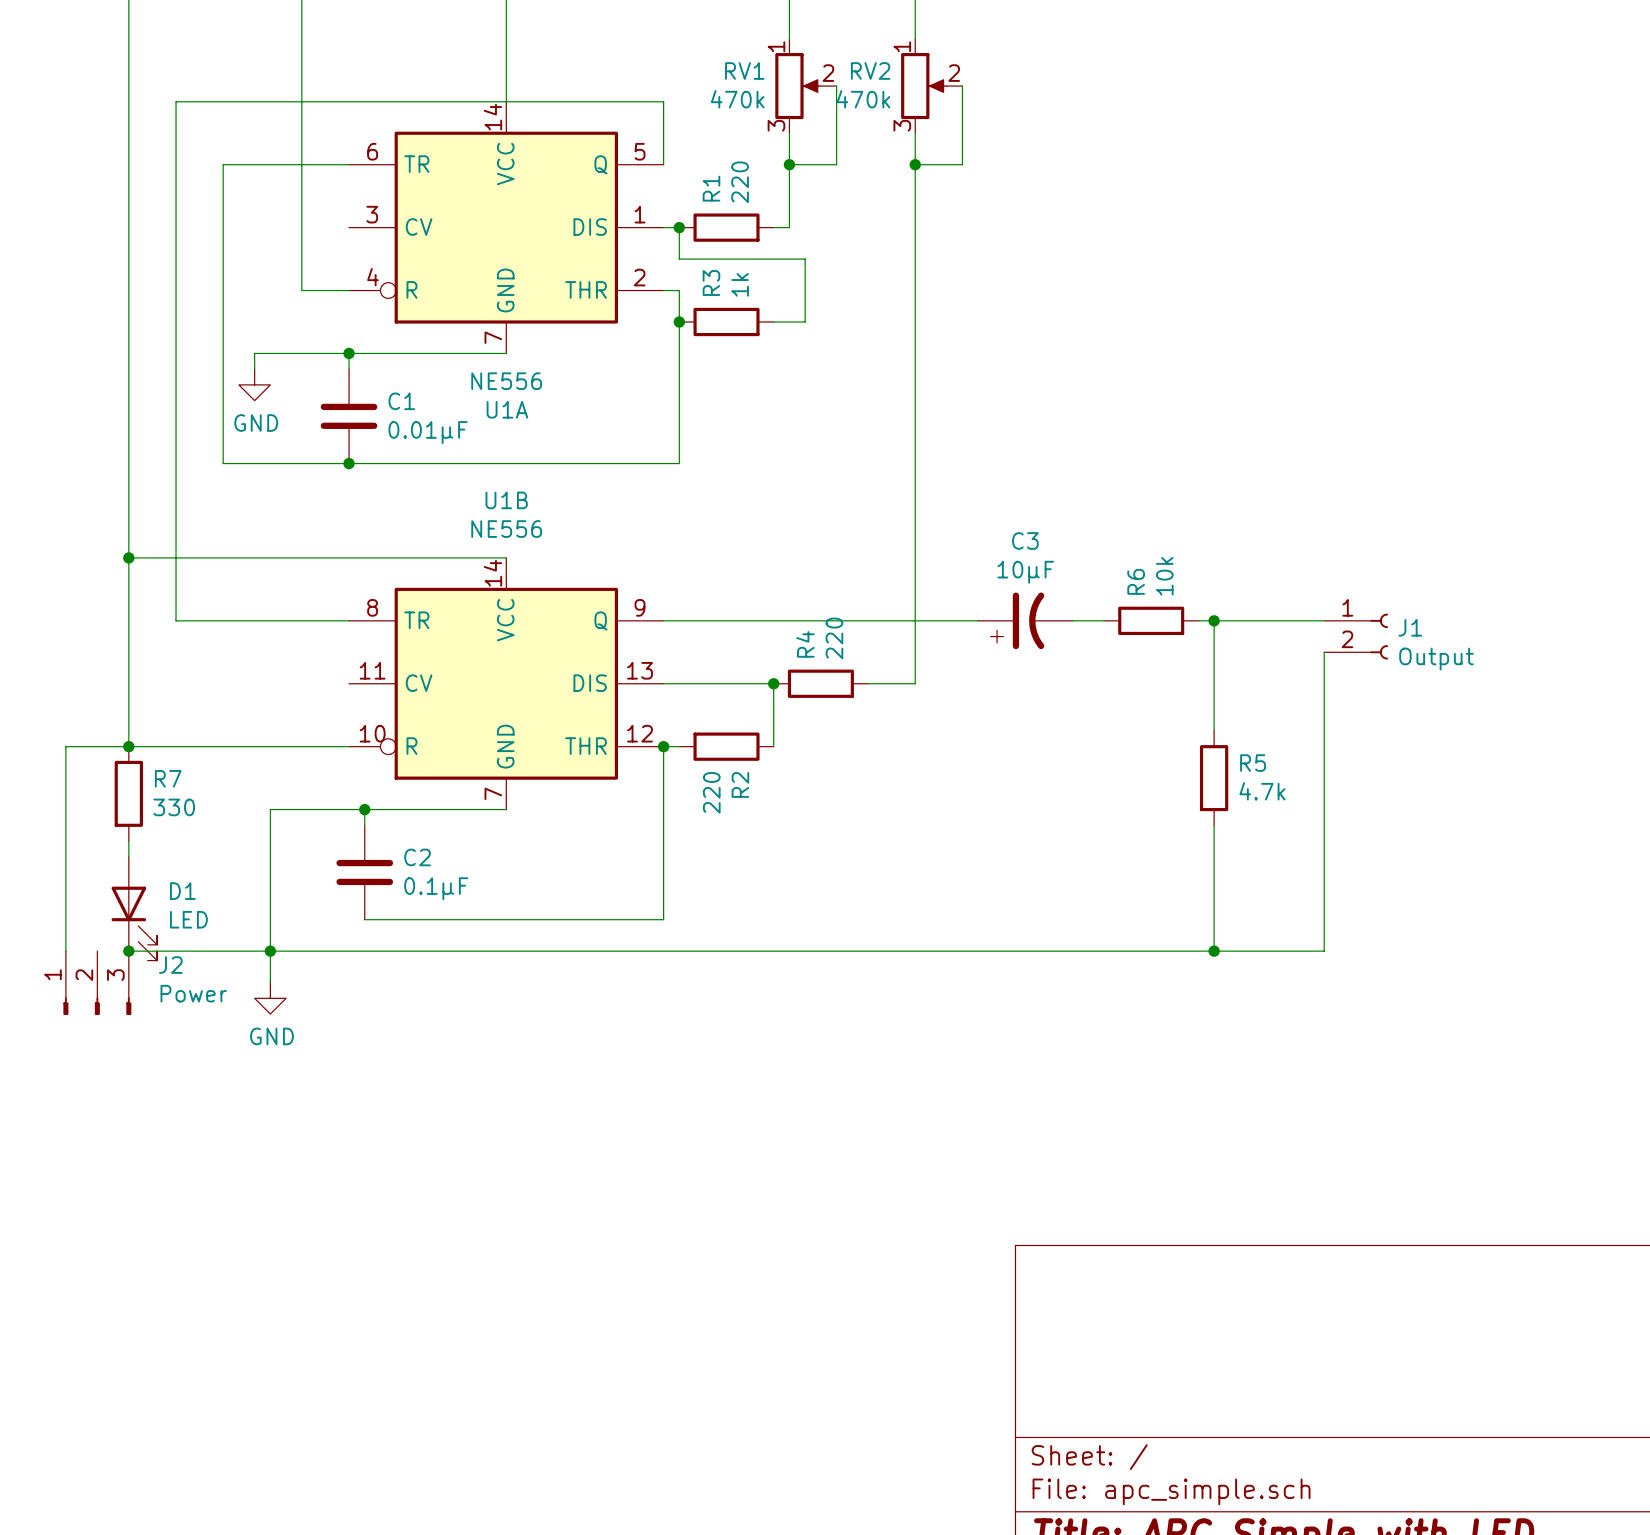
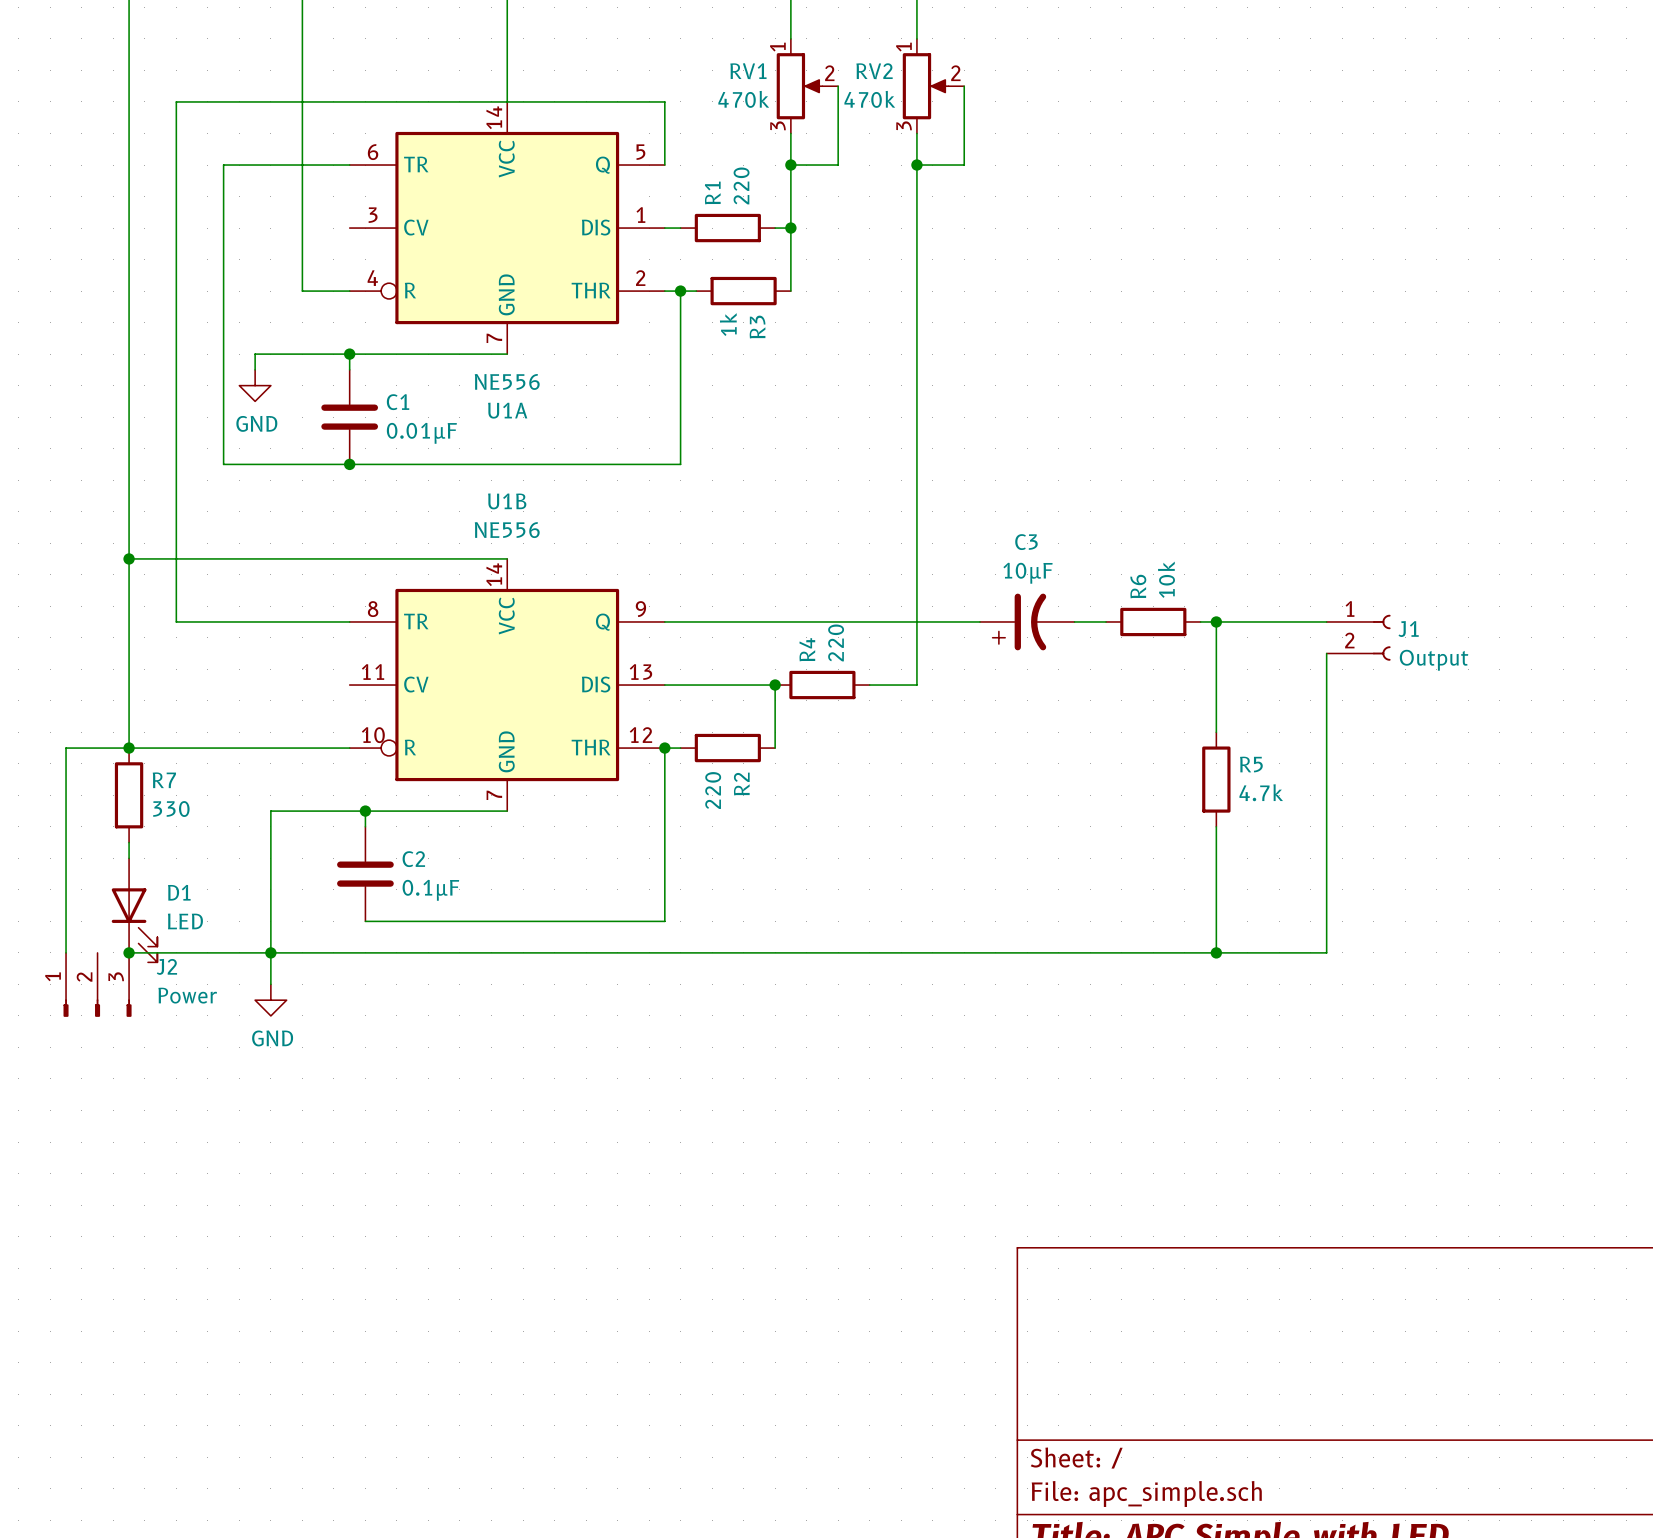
wire: (679, 227) (679, 259) (805, 259) (805, 321) (773, 321) -> none
junction: (679, 227) -> none
wire: none -> (790, 228) (790, 291)
junction: none -> (790, 228)
R3 name position: R3 (711, 283) -> R3 (757, 327)
R3 value position: 1k (740, 284) -> 1k (728, 324)
wire: none -> (680, 291) (696, 291)
junction: none -> (680, 291)
junction: (679, 321) -> none
R3 position: (726, 321) -> (743, 291)

